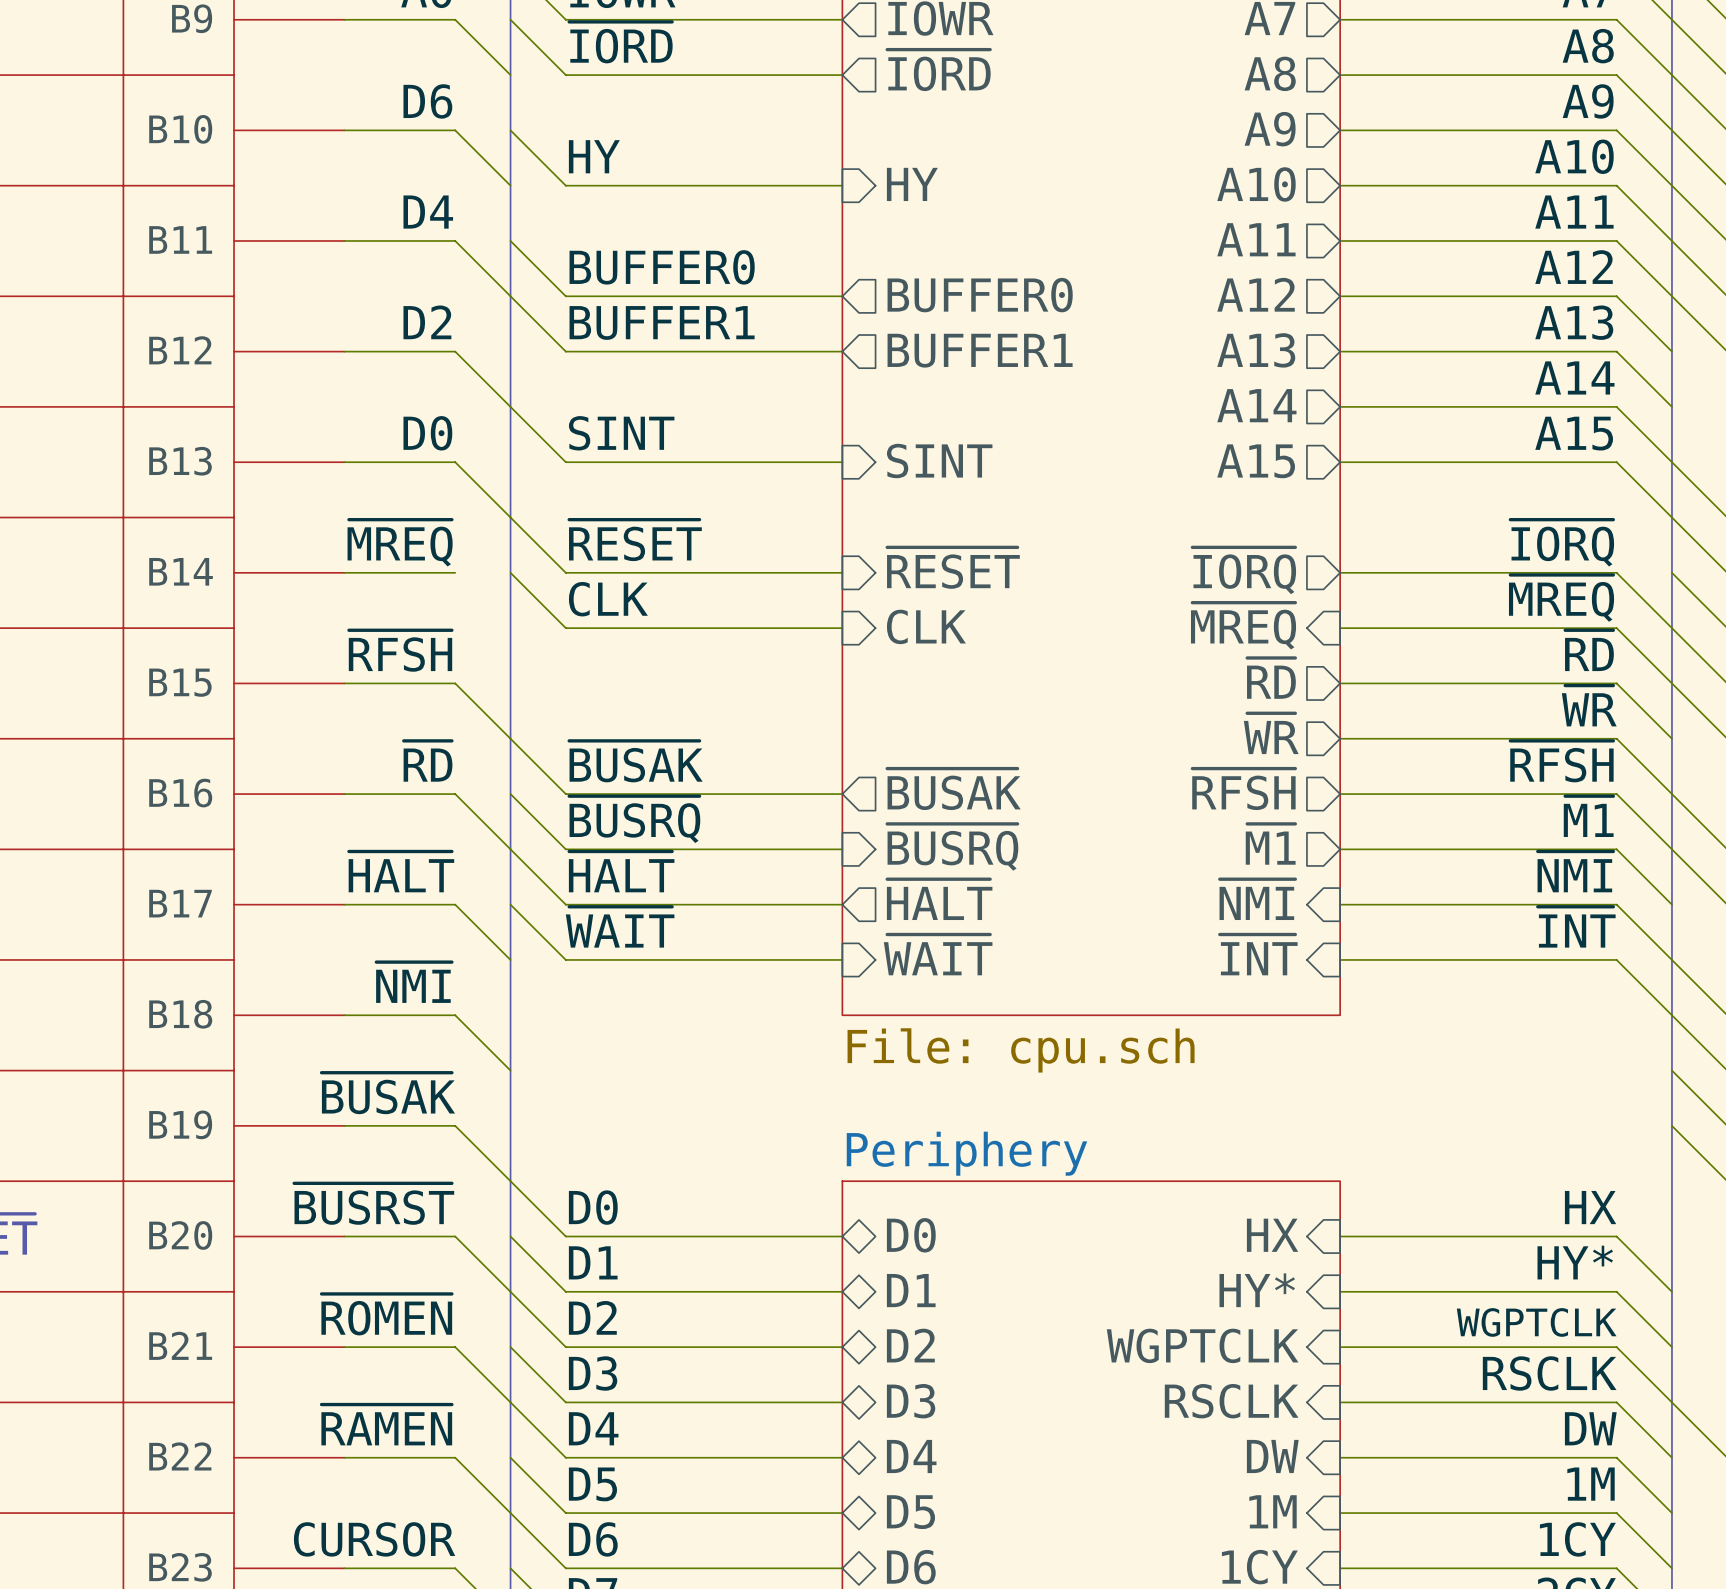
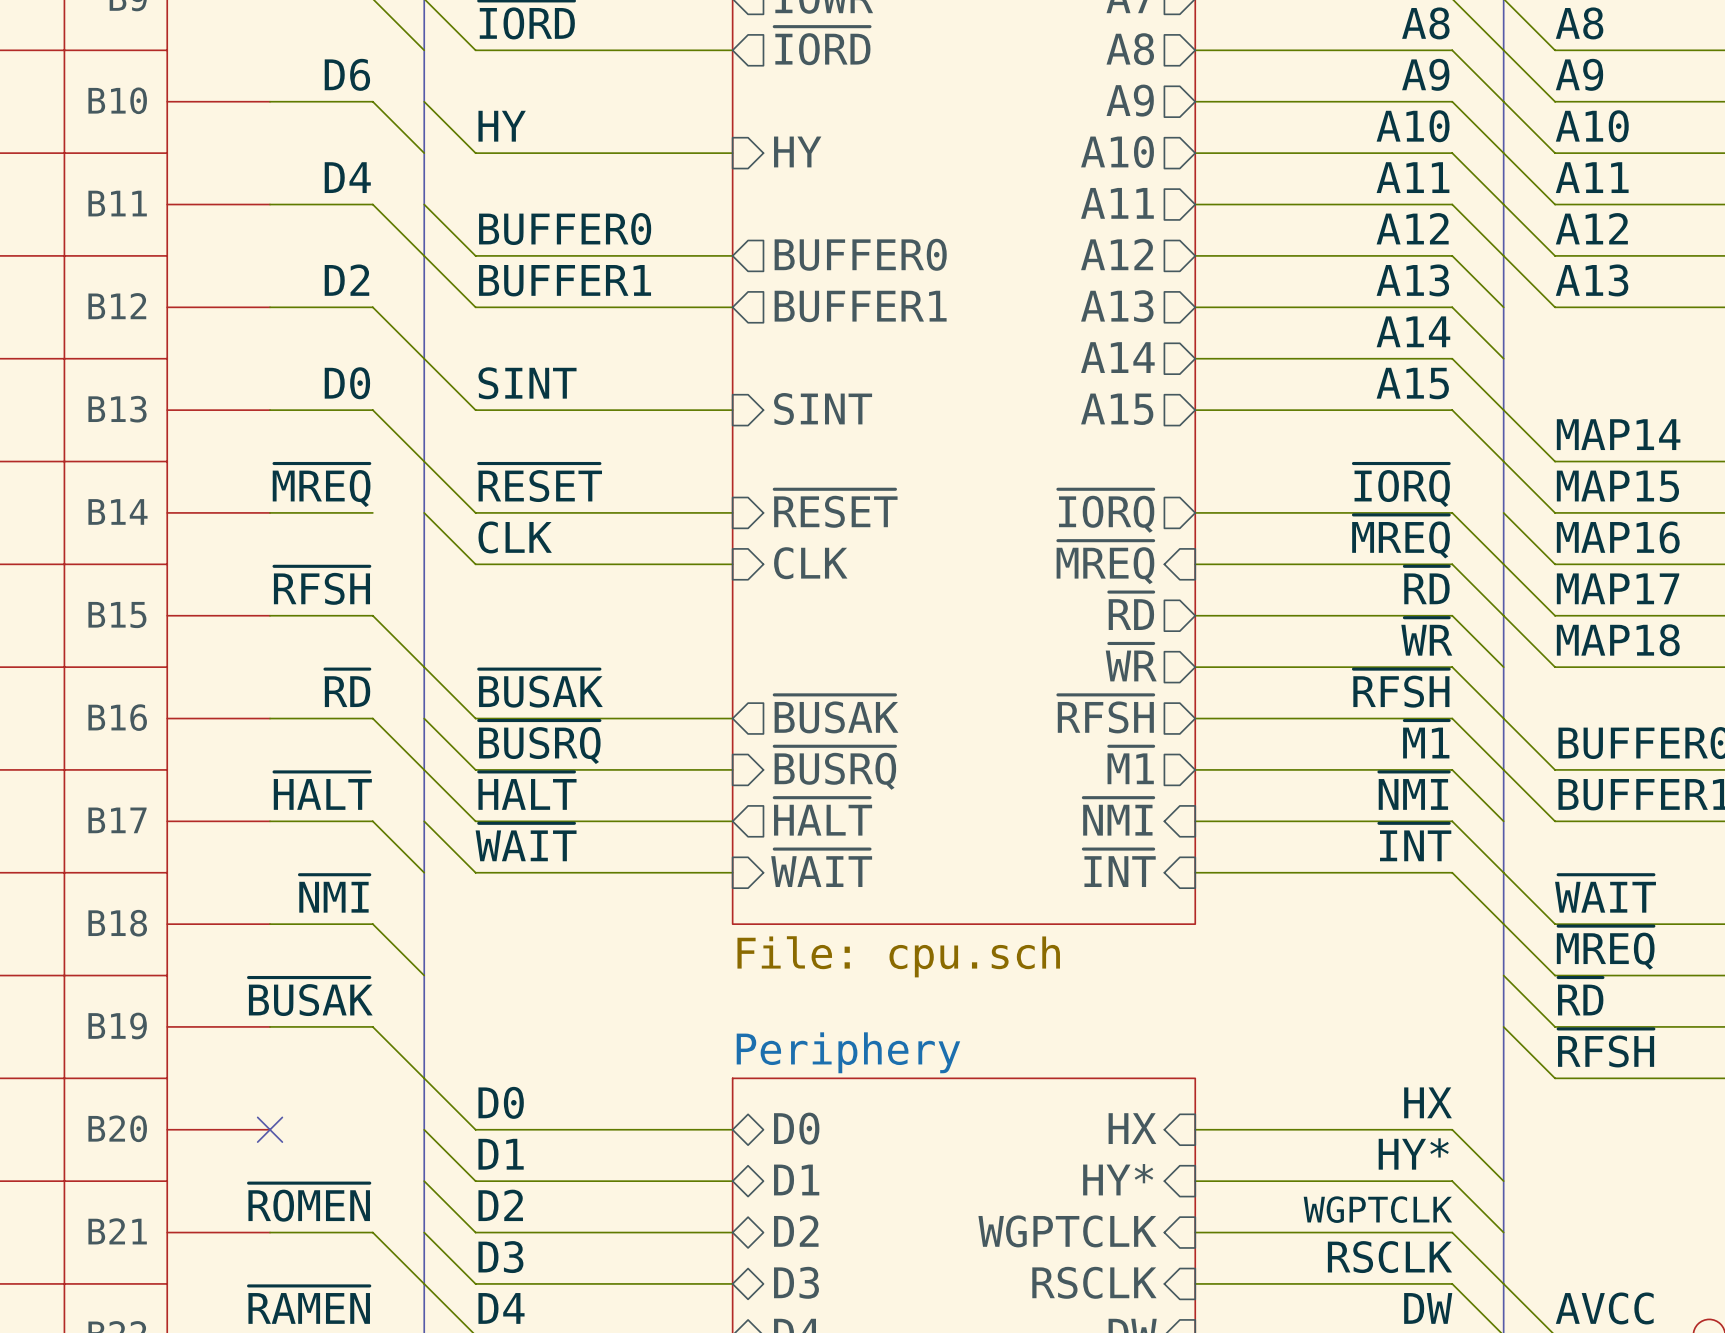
label: ~{BUSRST} (374, 1204) -> none
wire: (344, 1236) (455, 1236) (510, 1291) -> none
no-connect mark: none -> (270, 1129)

